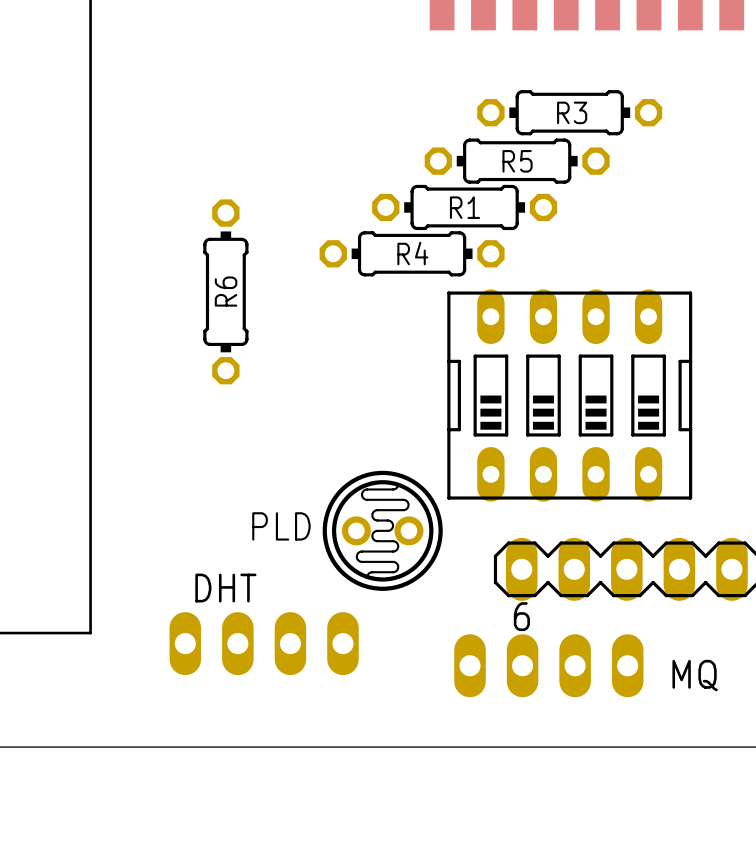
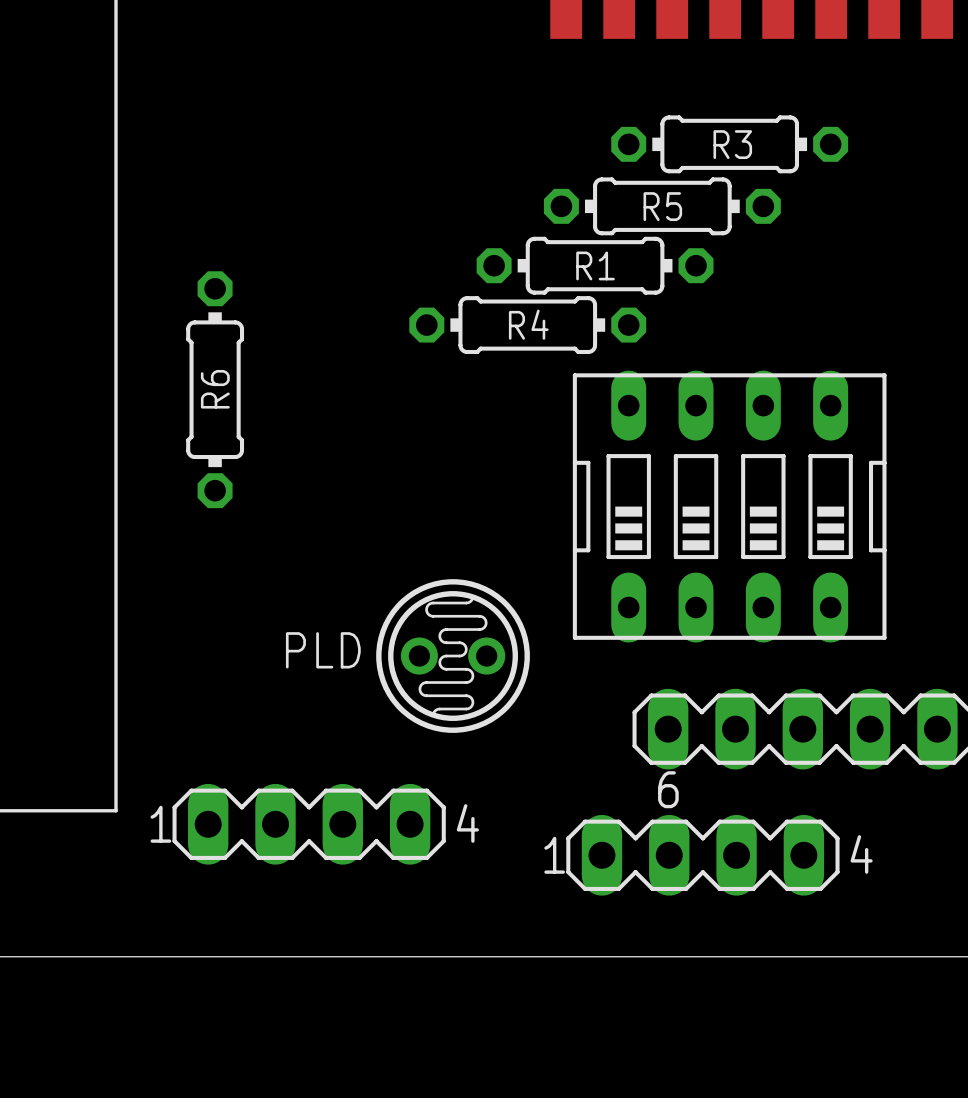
R6 position: (225, 291) -> (215, 389)
PLD position: (382, 530) -> (453, 656)
DHT side: bottom (264, 643) -> top (309, 824)
MQ side: bottom (548, 665) -> top (702, 855)

